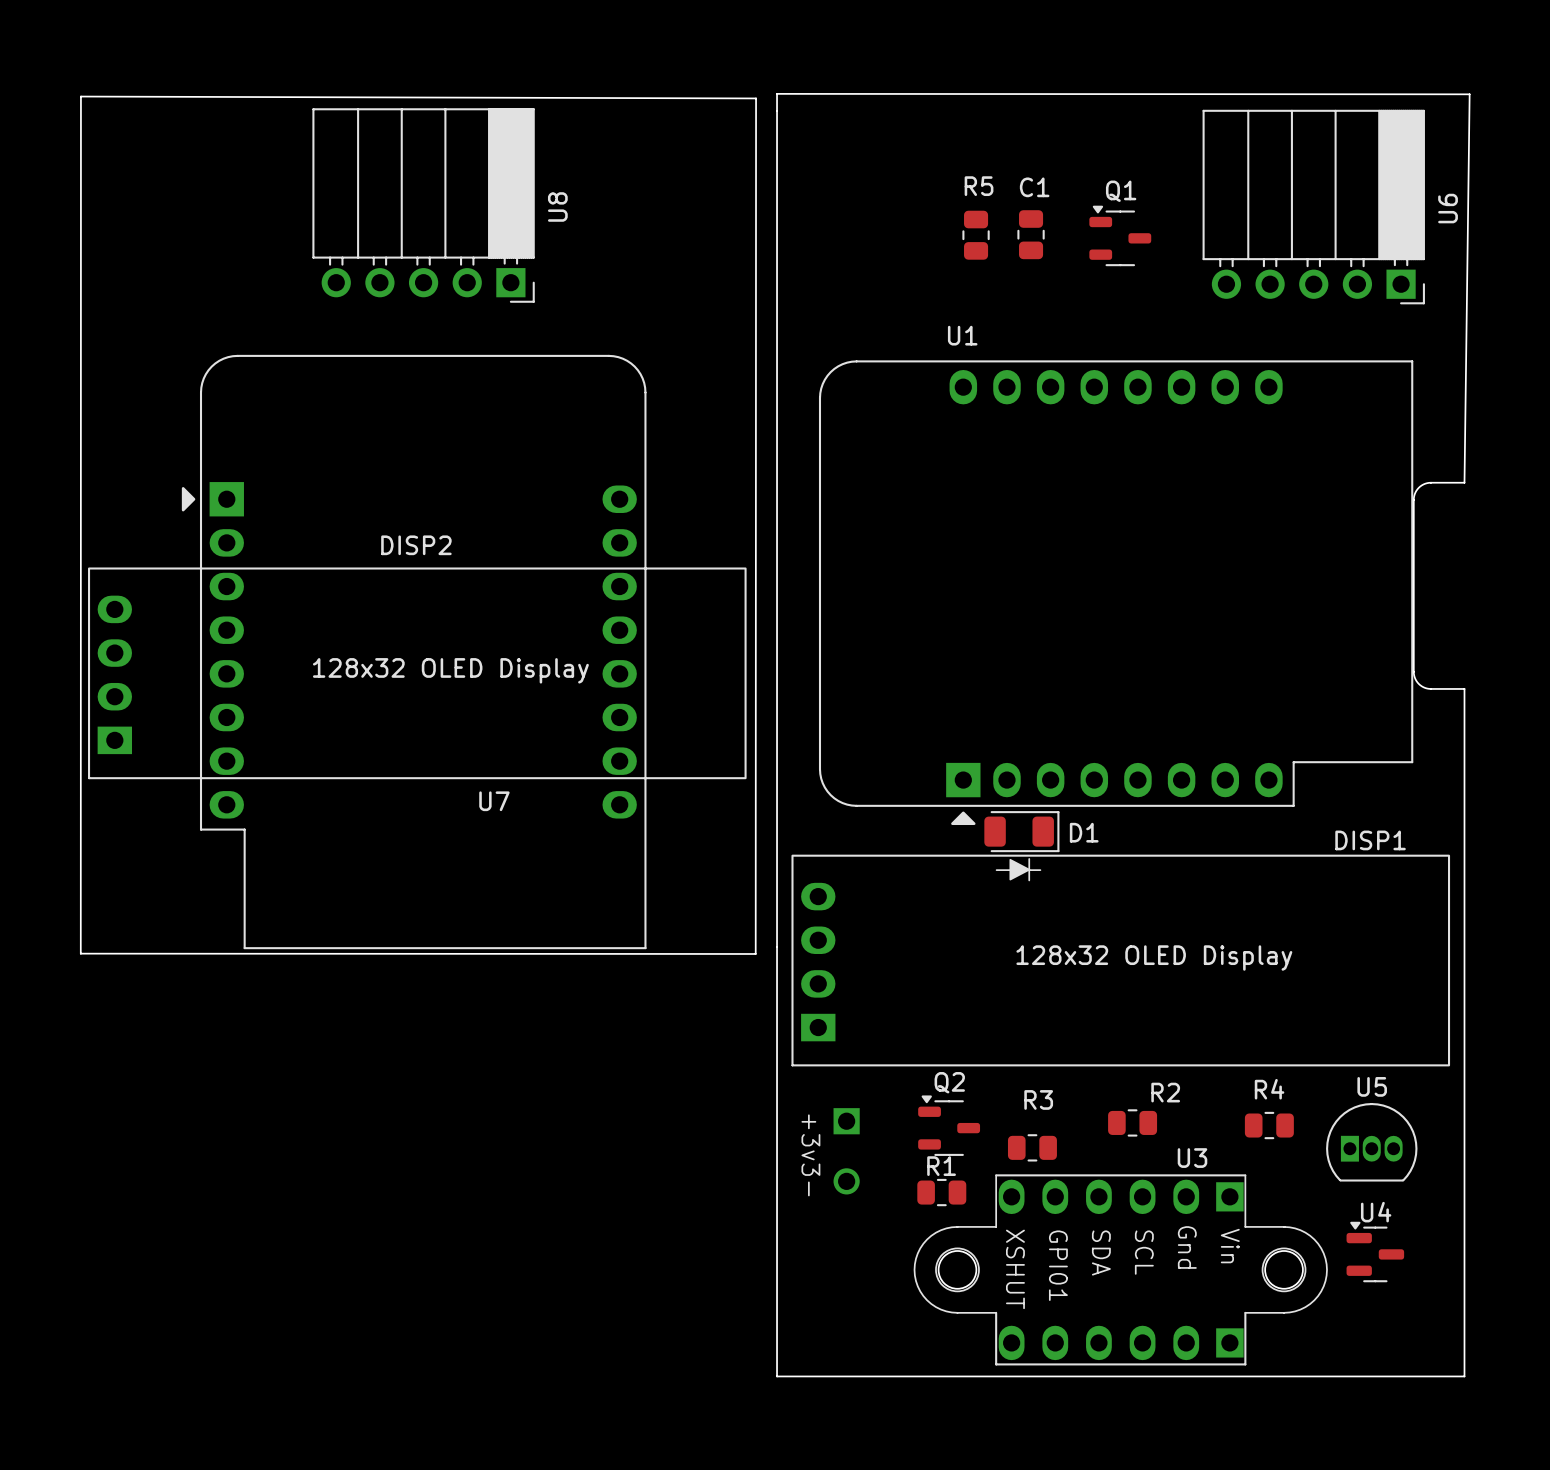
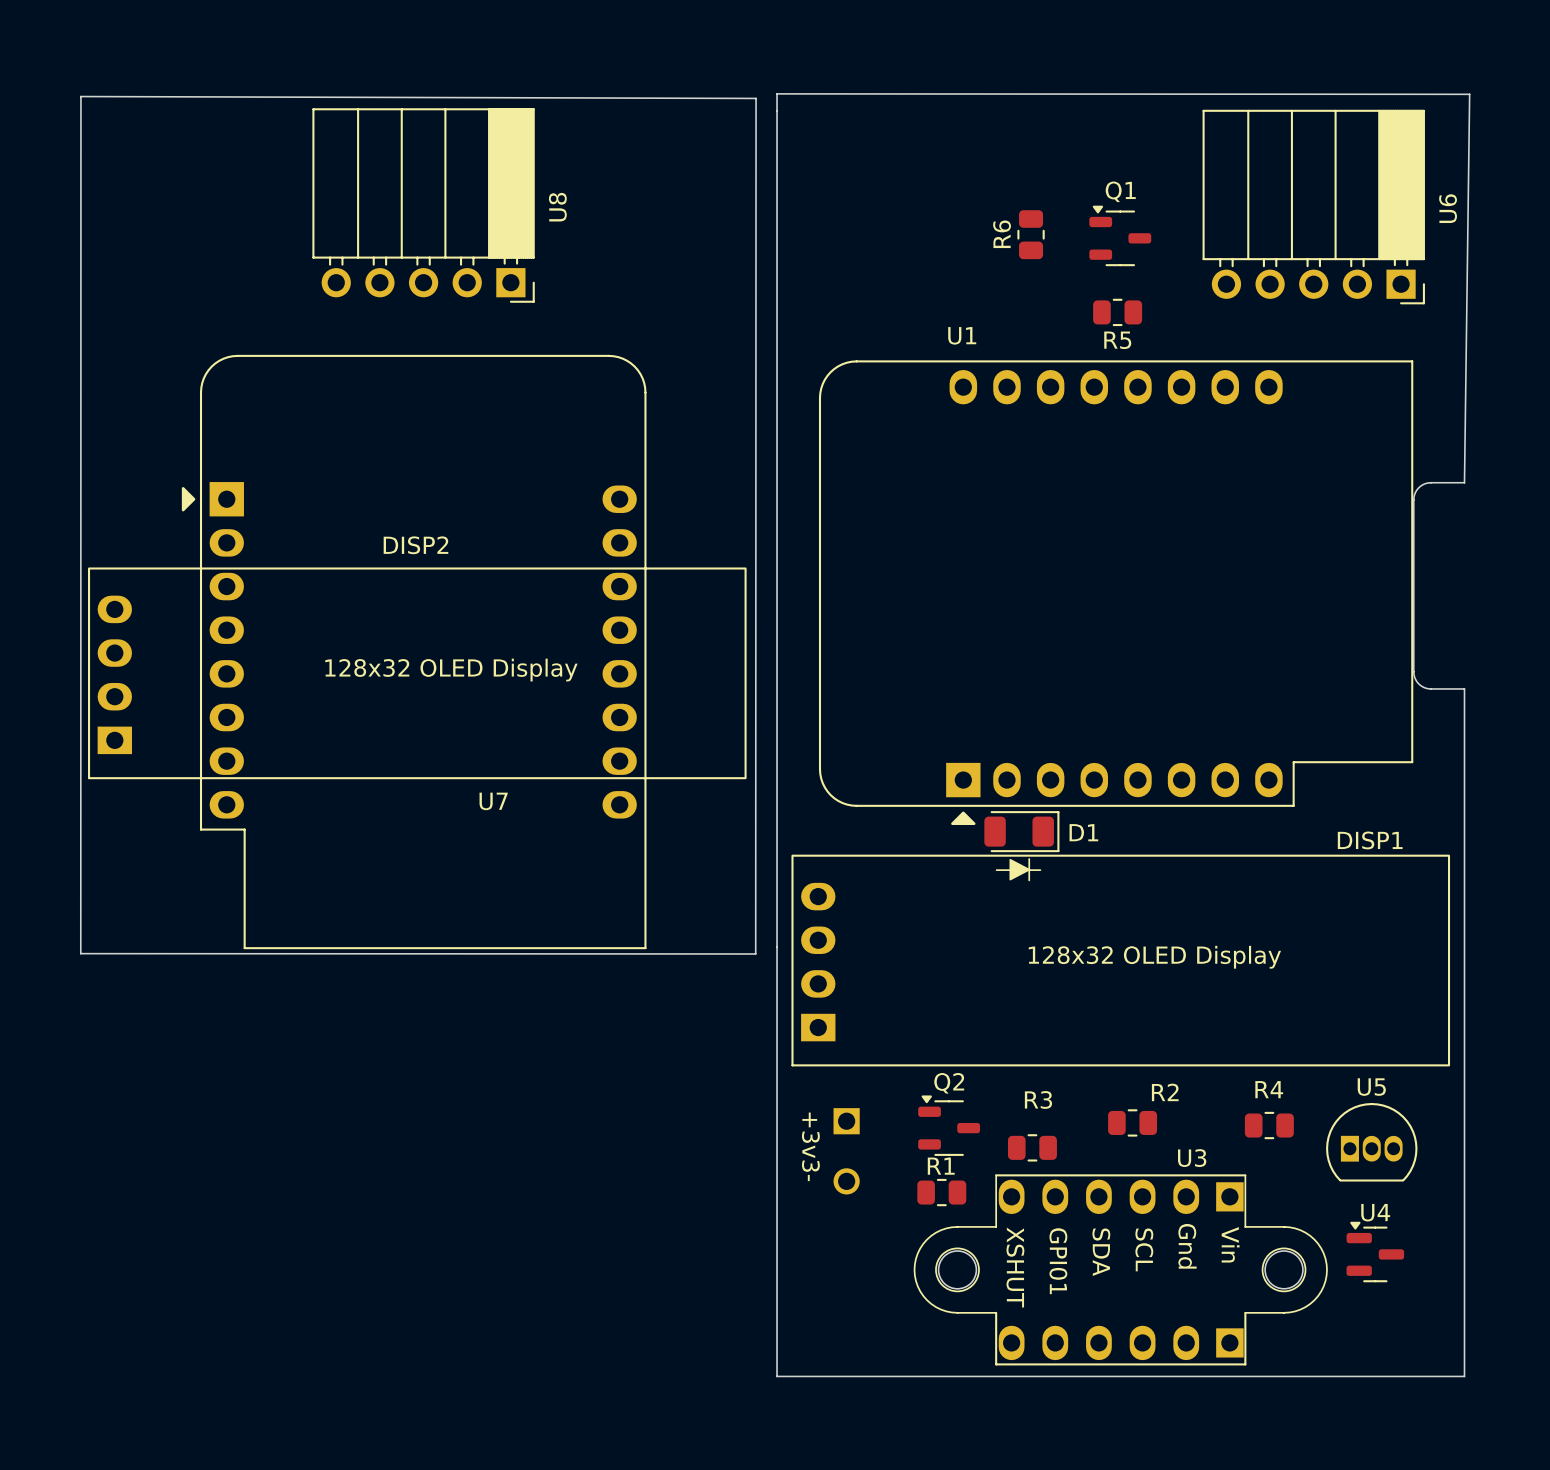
R5 name position: R5 (979, 186) -> R5 (1117, 340)
C1 name: C1 (1034, 187) -> R6 (1002, 234)
R5 rotation: 0° (976, 235) -> 90° clockwise (1117, 312)
R5 position: (976, 235) -> (1117, 312)

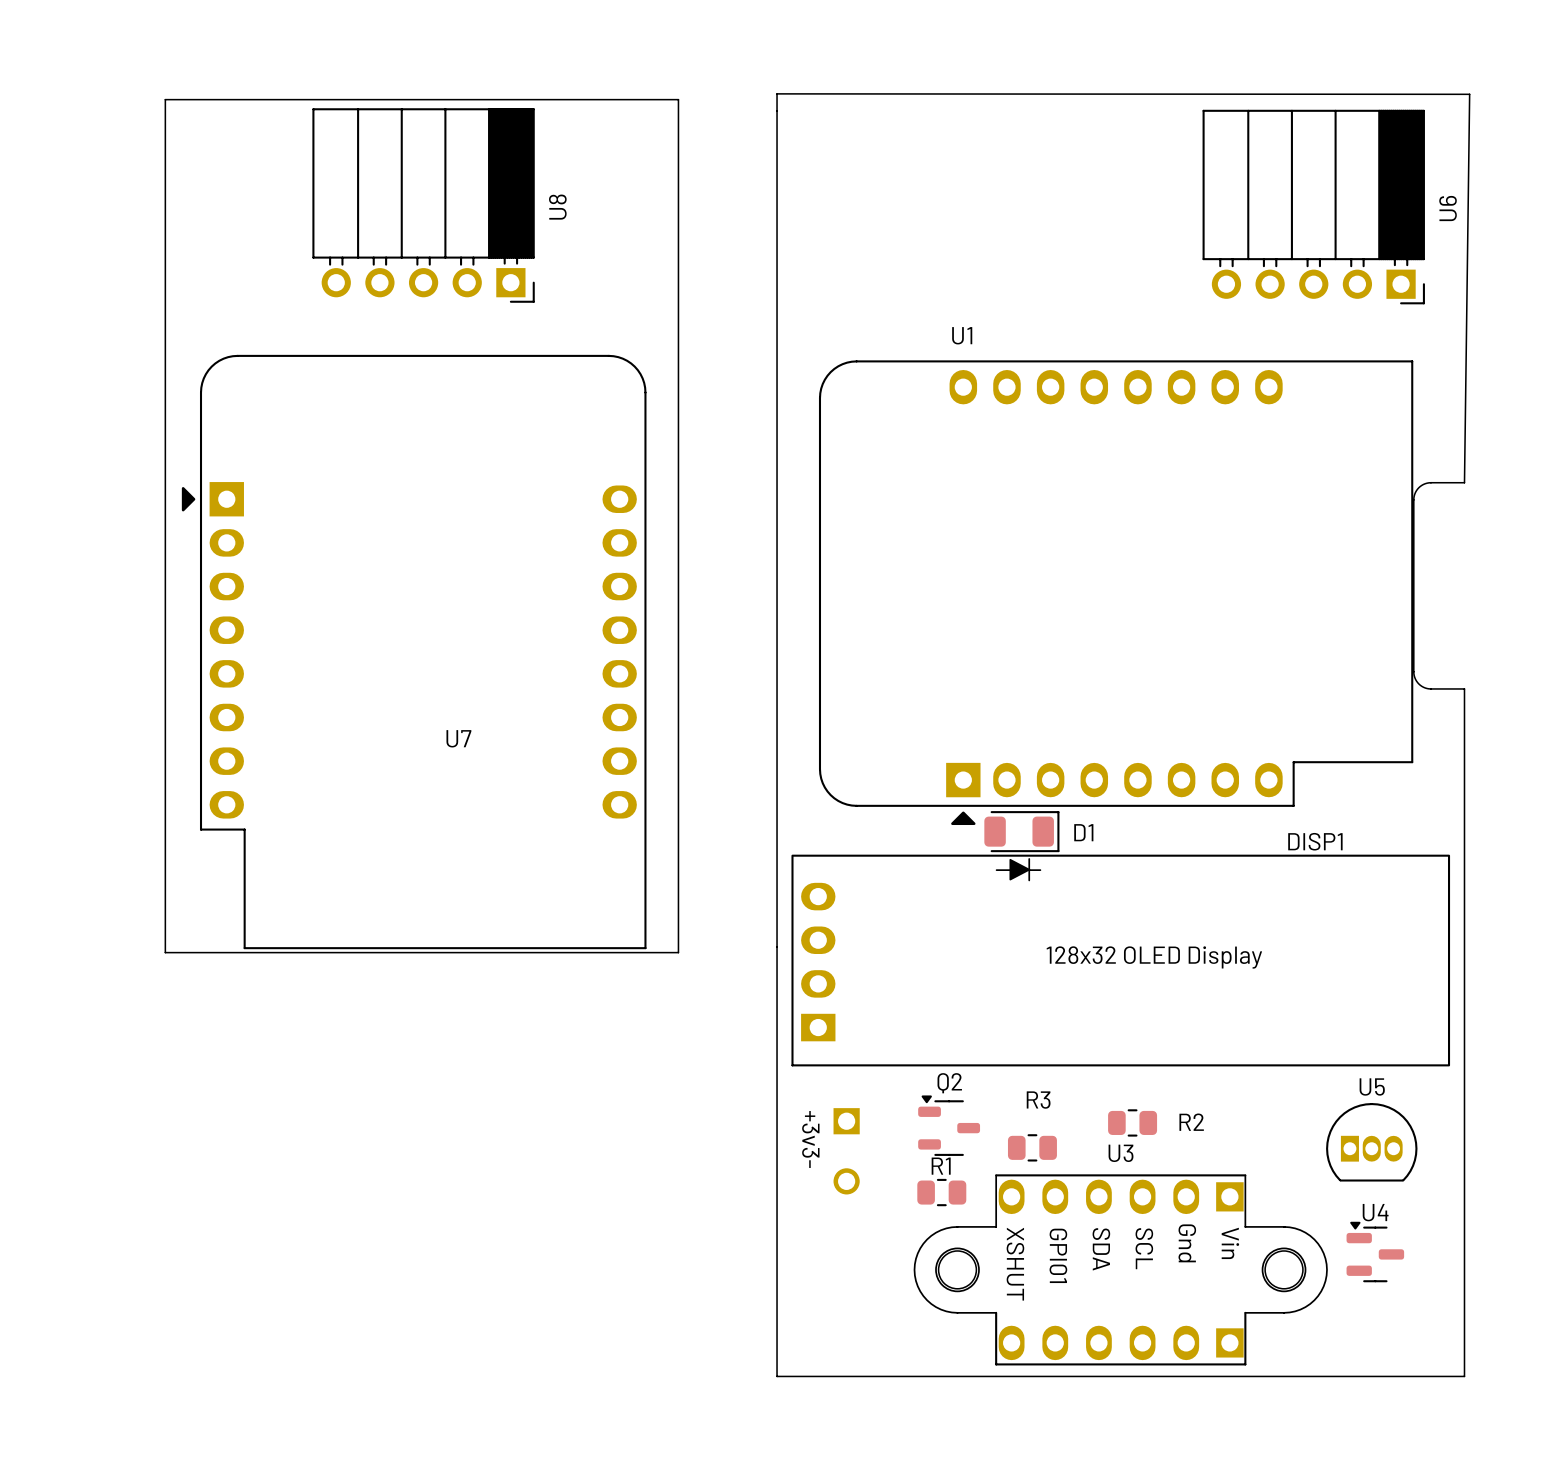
board edge: (80, 96) (80, 953) (755, 953) (756, 98) (80, 96) -> (165, 99) (165, 952) (678, 952) (678, 99) (165, 99)
R6: (1031, 234) -> none
Q1: (1120, 235) -> none
R5: (1117, 312) -> none
DISP2: (417, 673) -> none
U7 name position: U7 (493, 801) -> U7 (458, 738)
DISP1 name position: DISP1 (1370, 840) -> DISP1 (1315, 841)
R2 name position: R2 (1165, 1092) -> R2 (1191, 1122)
R4: (1269, 1125) -> none
U3 name position: U3 (1192, 1158) -> U3 (1121, 1153)

